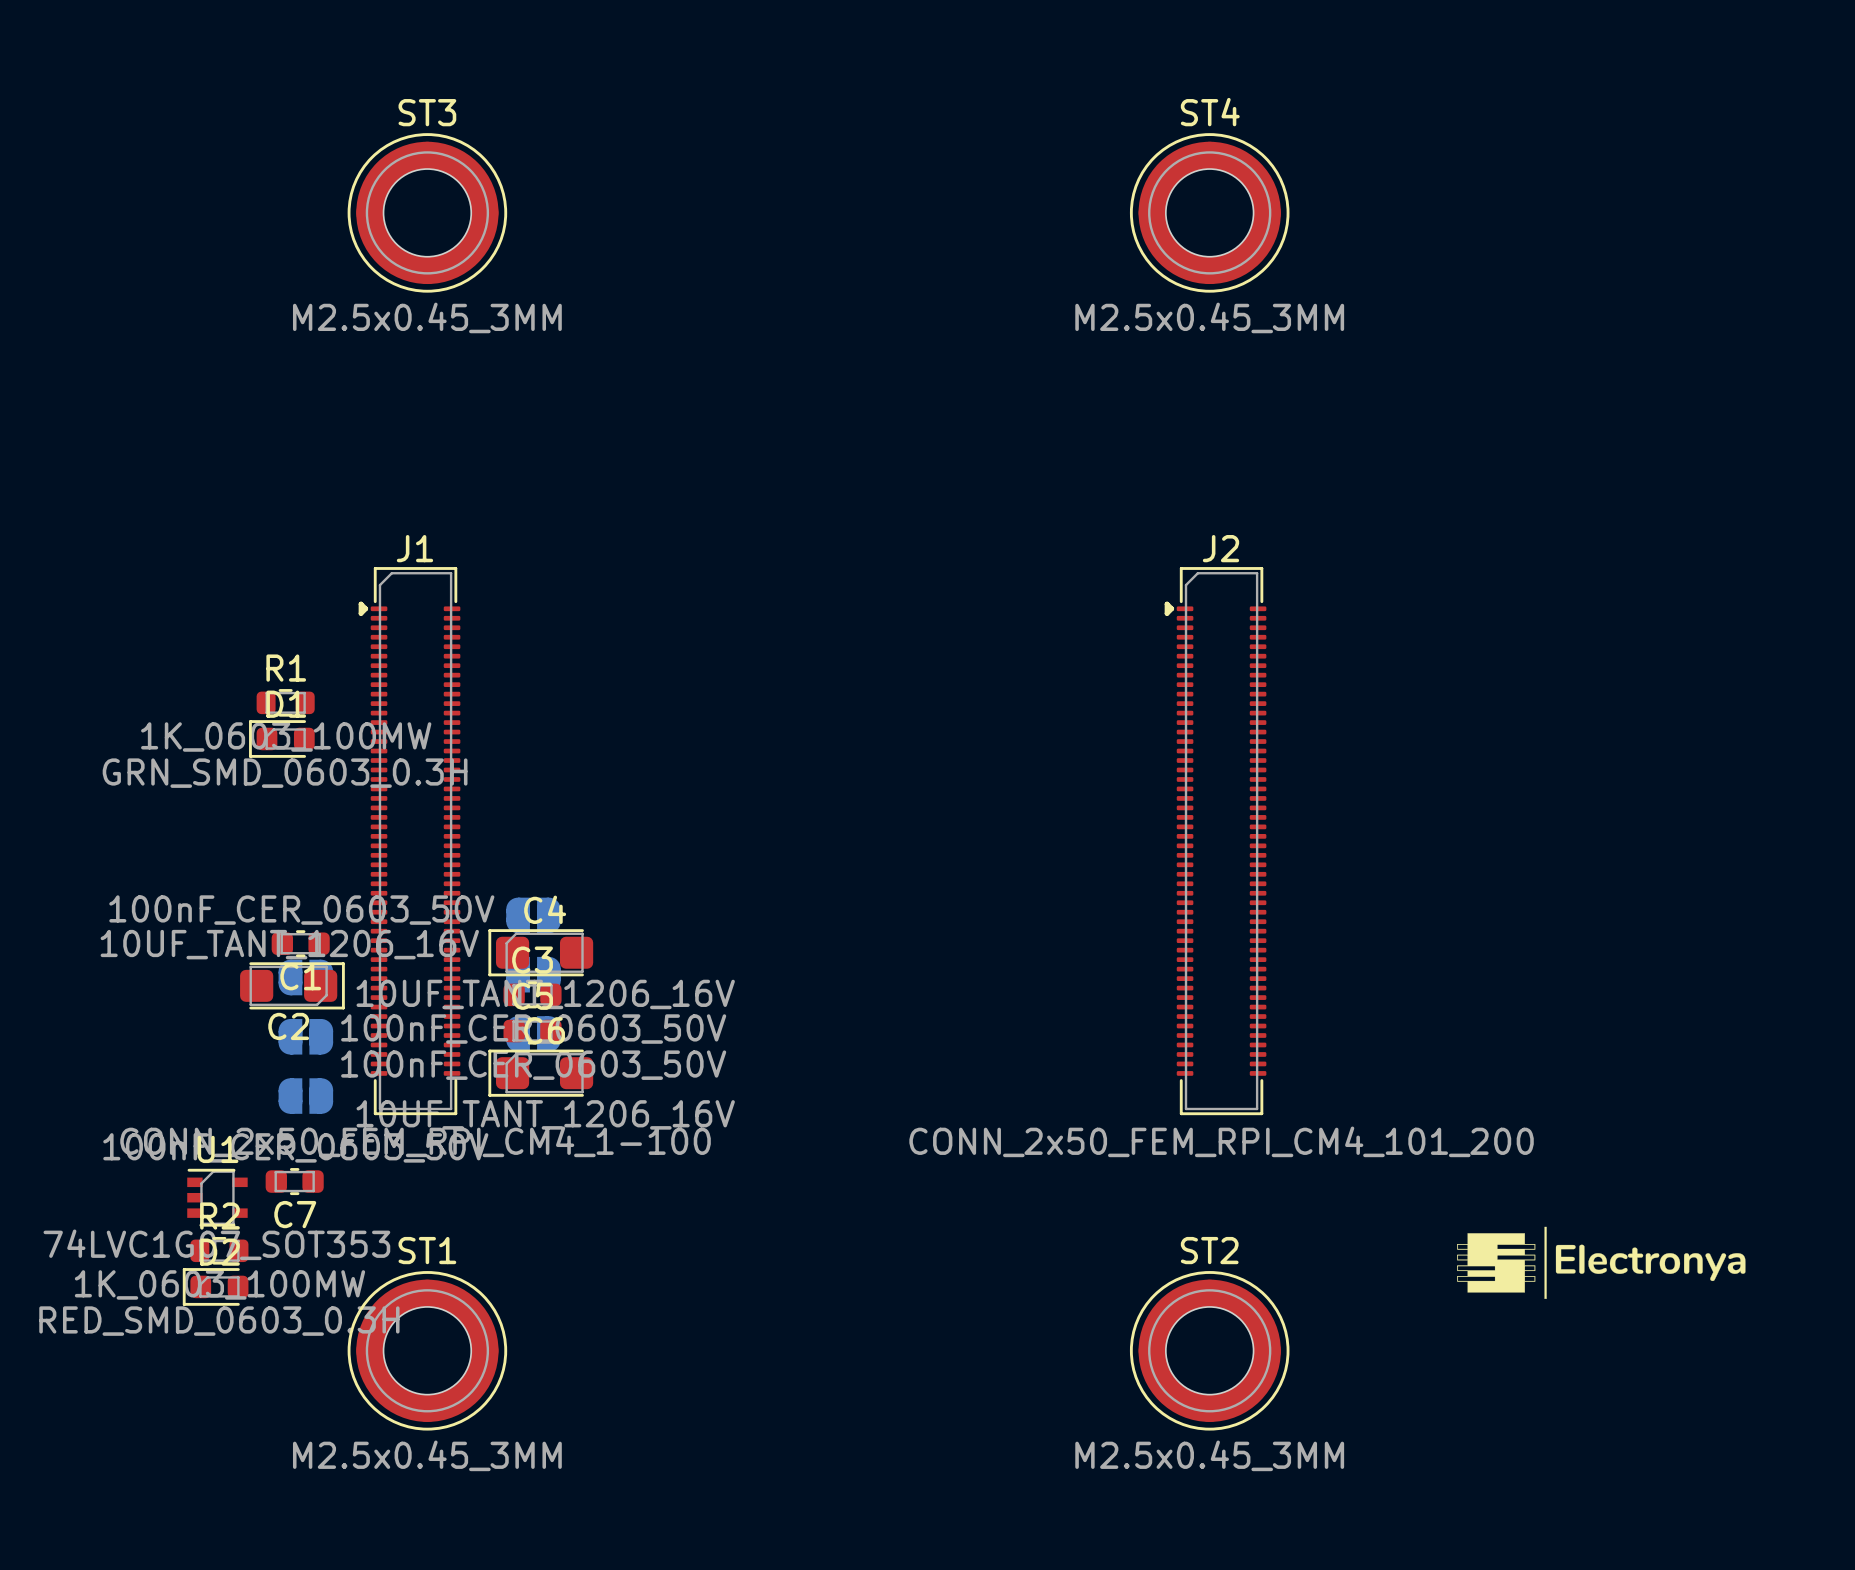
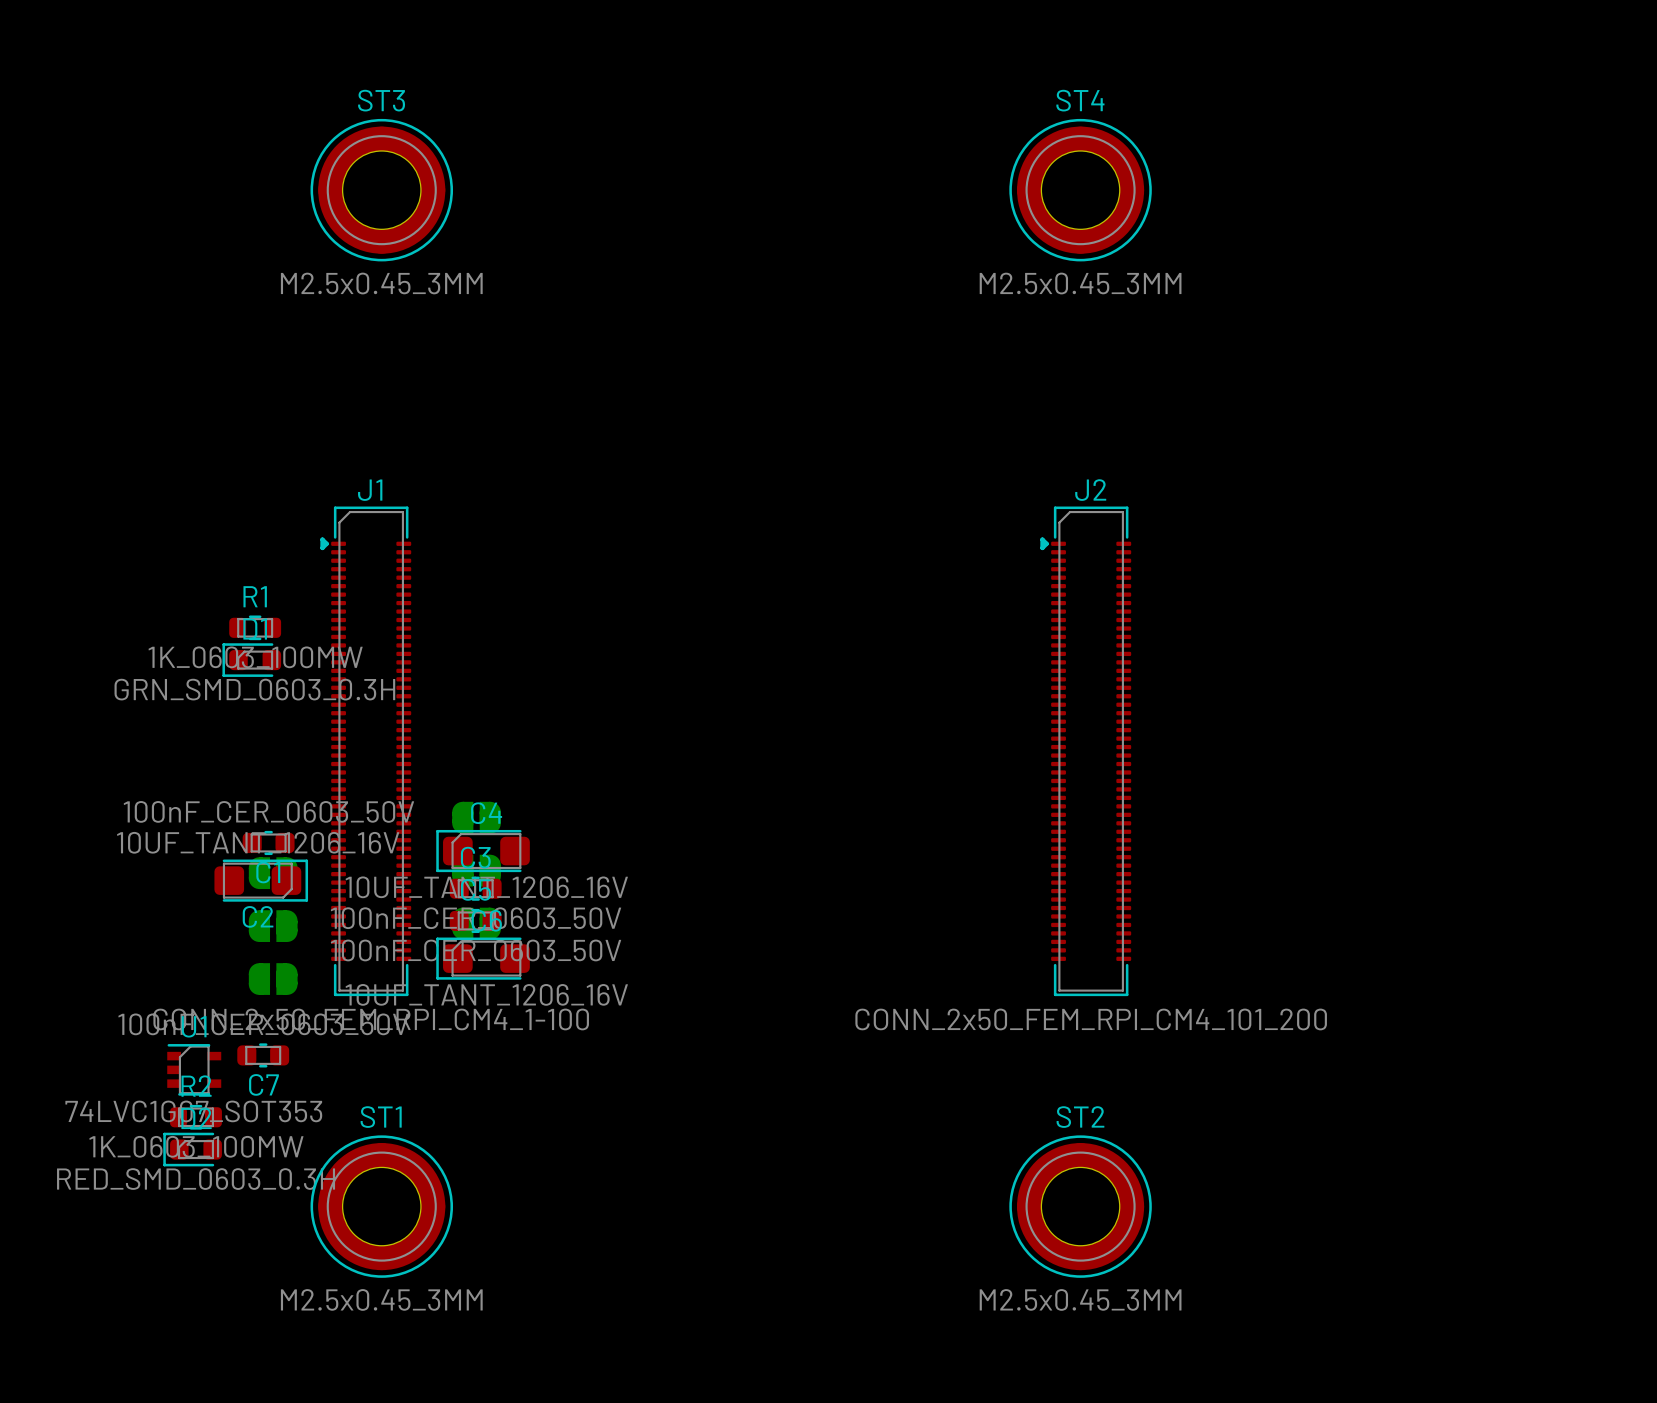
drawing: [1457, 1226, 1746, 1299] -> none

